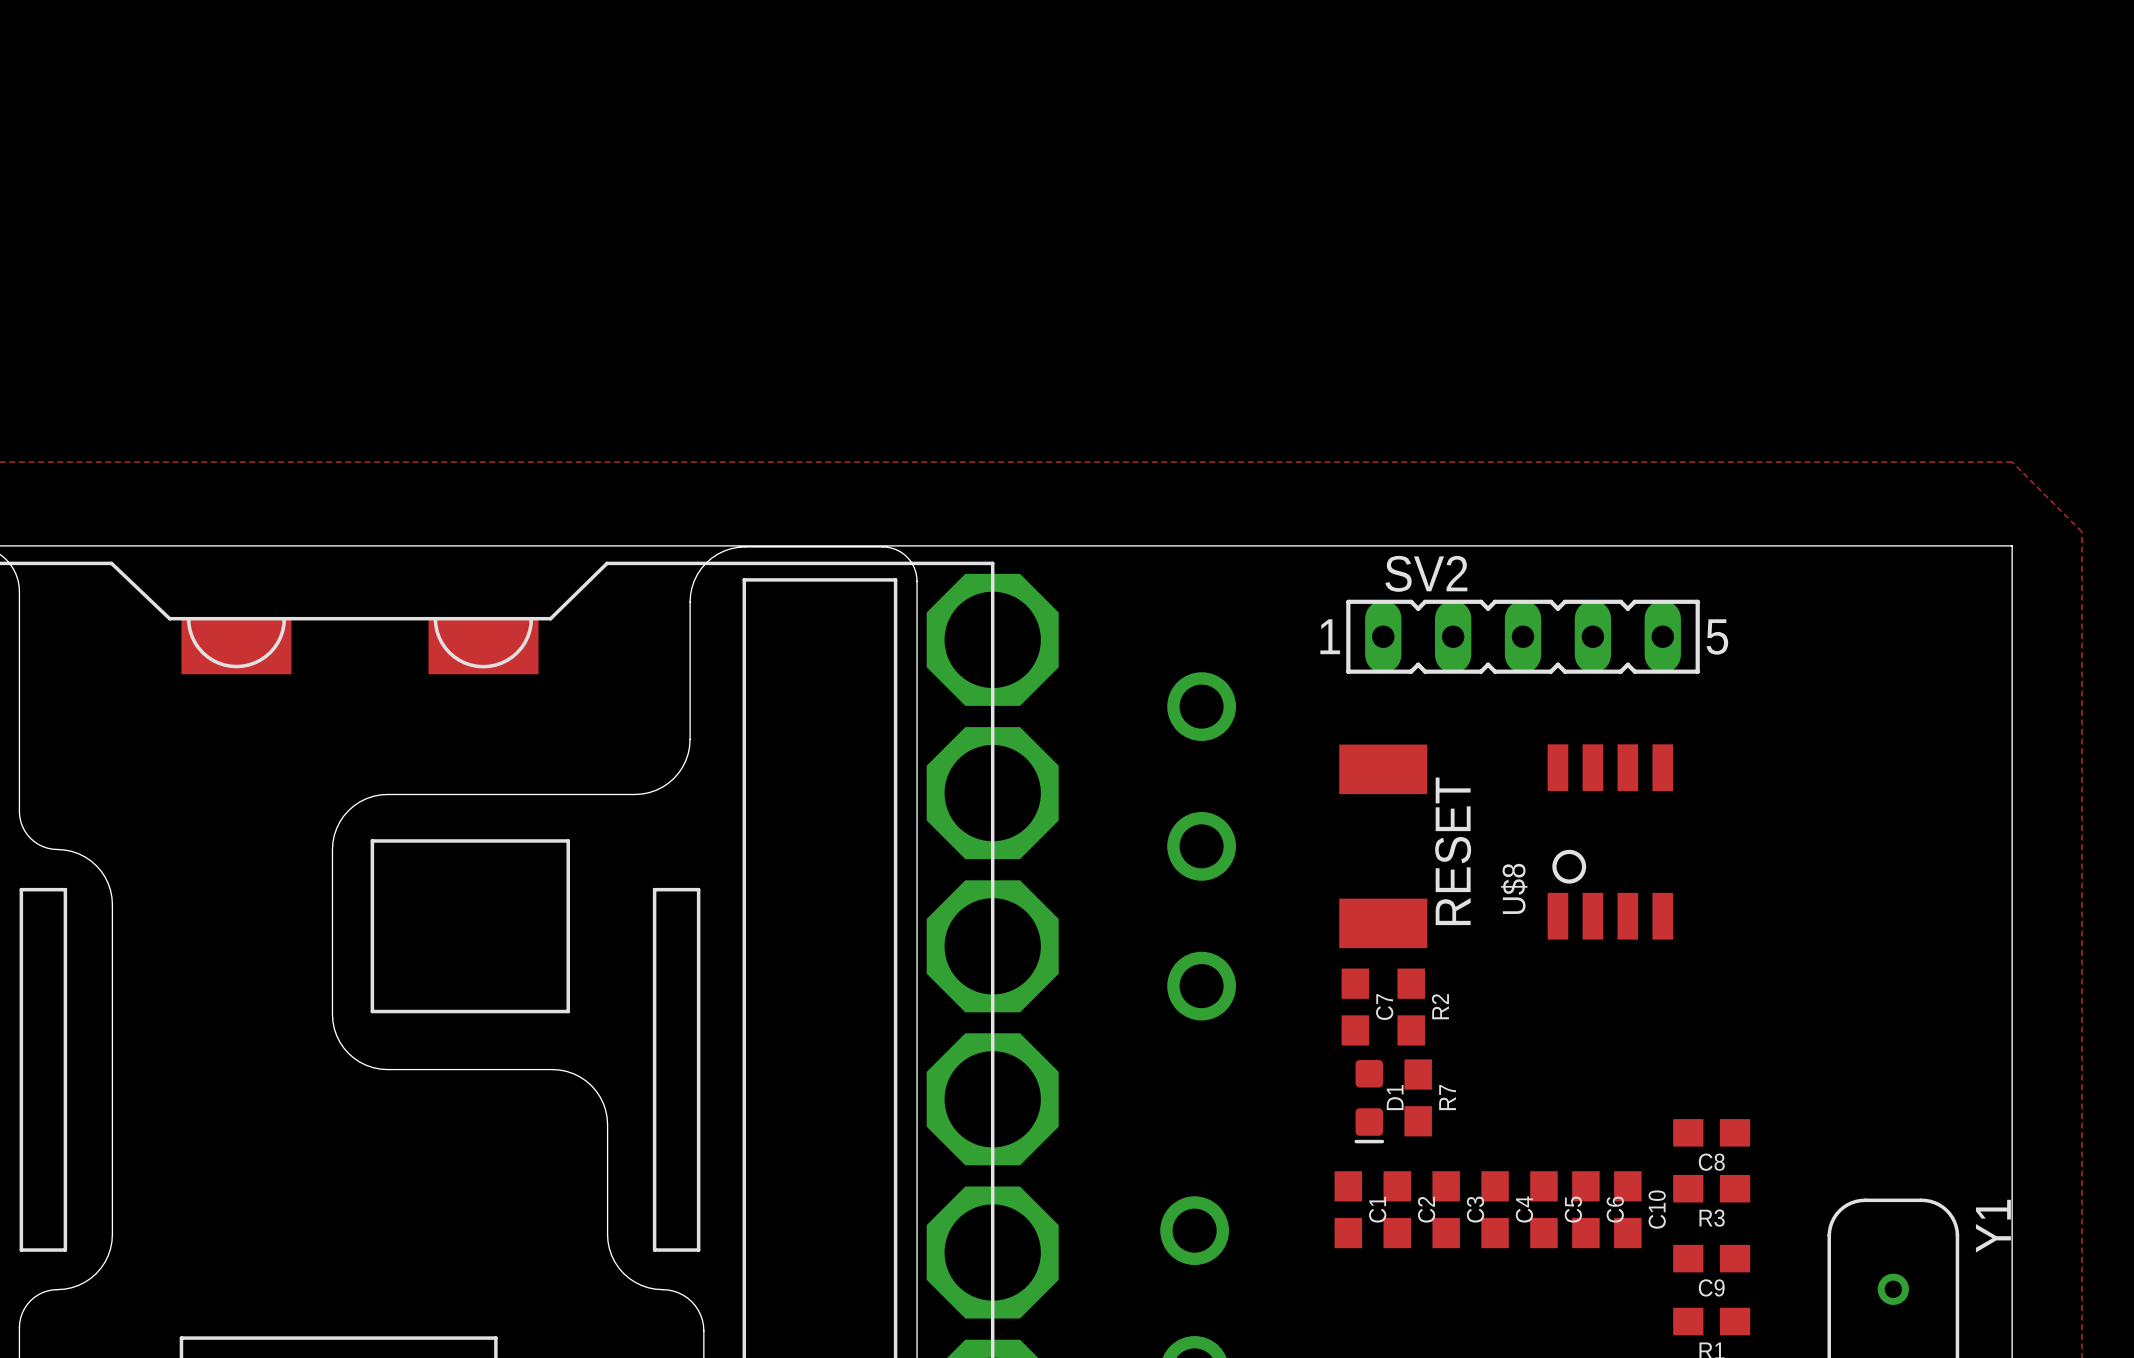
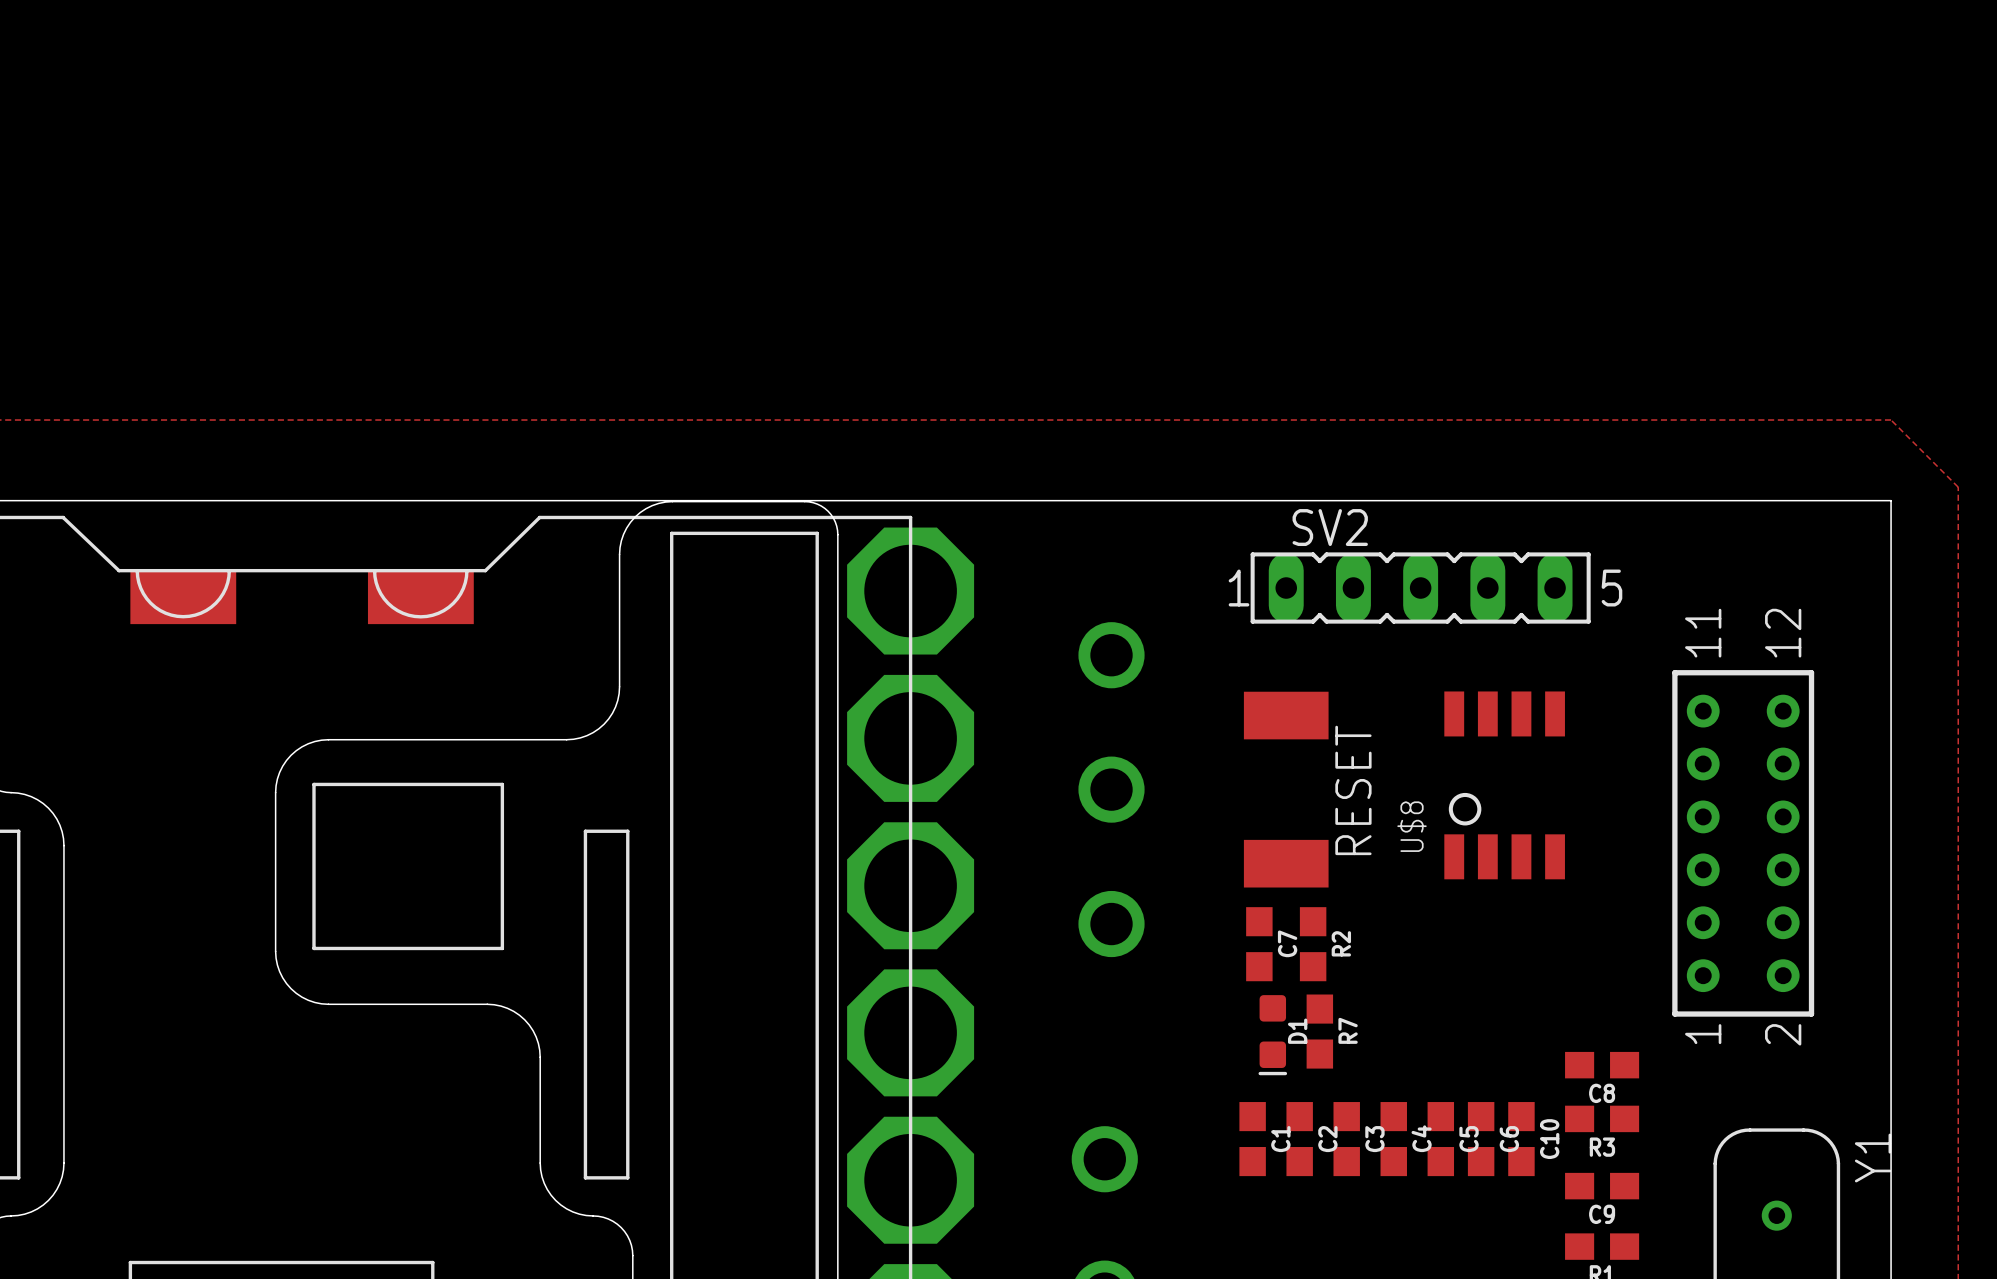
part: none -> (1743, 843)

